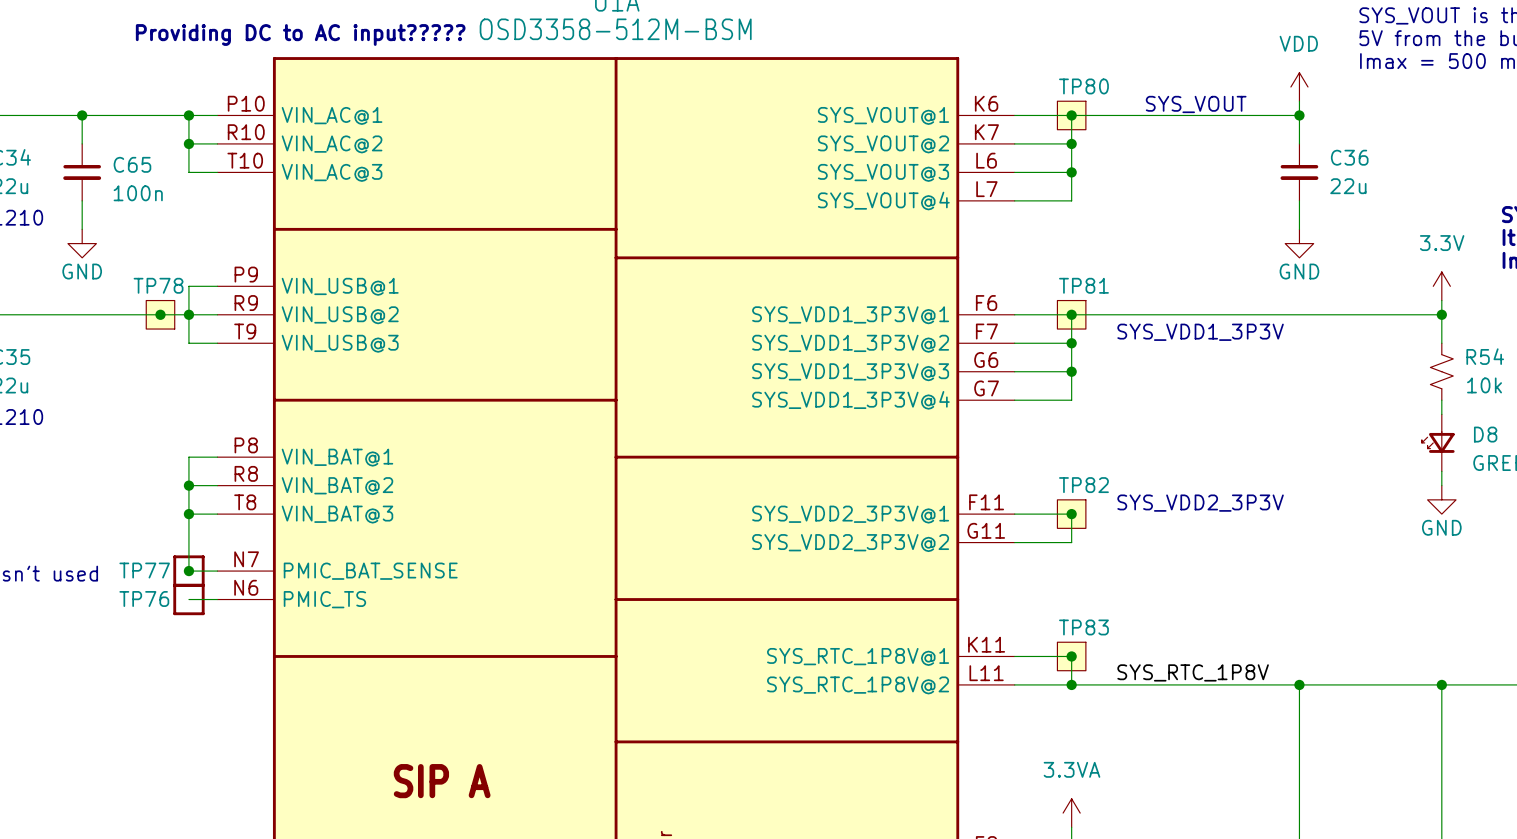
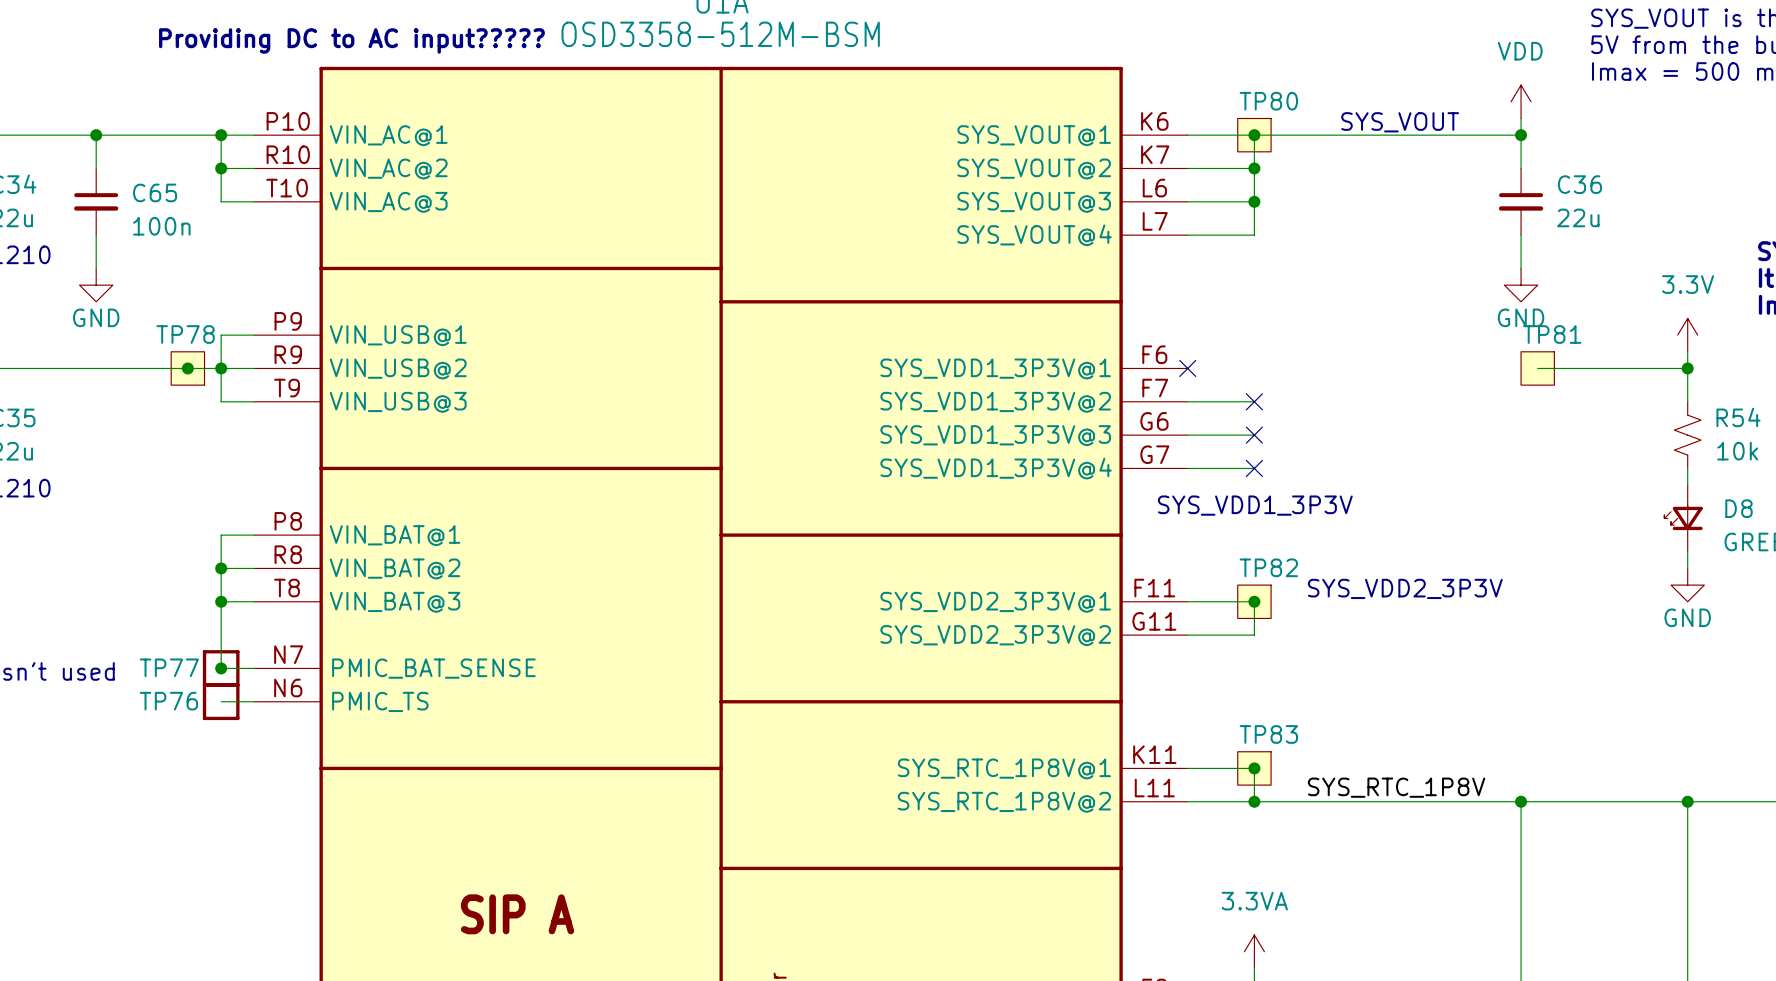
wire: (1014, 314) (1313, 314) -> none
no-connect mark: none -> (1187, 368)
wire: (1071, 314) (1071, 400) -> none
junction: (1071, 314) -> none
TP81 position: (1071, 314) -> (1537, 368)
text position: SYS_VDD1_3P3V (1200, 332) -> SYS_VDD1_3P3V (1255, 505)
junction: (1071, 343) -> none
no-connect mark: none -> (1254, 401)
junction: (1071, 371) -> none
no-connect mark: none -> (1254, 435)
no-connect mark: none -> (1254, 468)

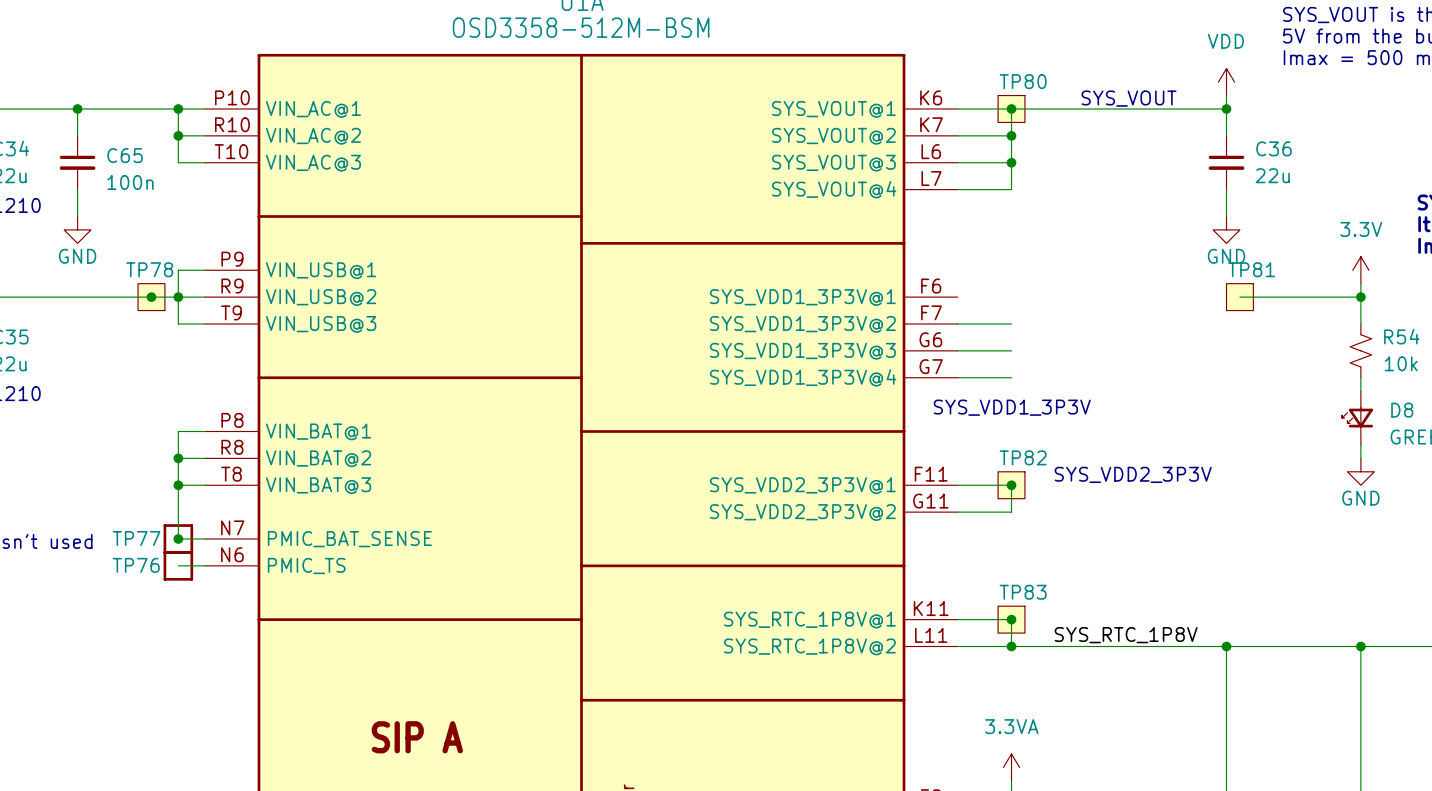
text: Providing DC to AC input????? (351, 40) -> none
no-connect mark: (1187, 368) -> none
no-connect mark: (1254, 401) -> none
no-connect mark: (1254, 435) -> none
no-connect mark: (1254, 468) -> none

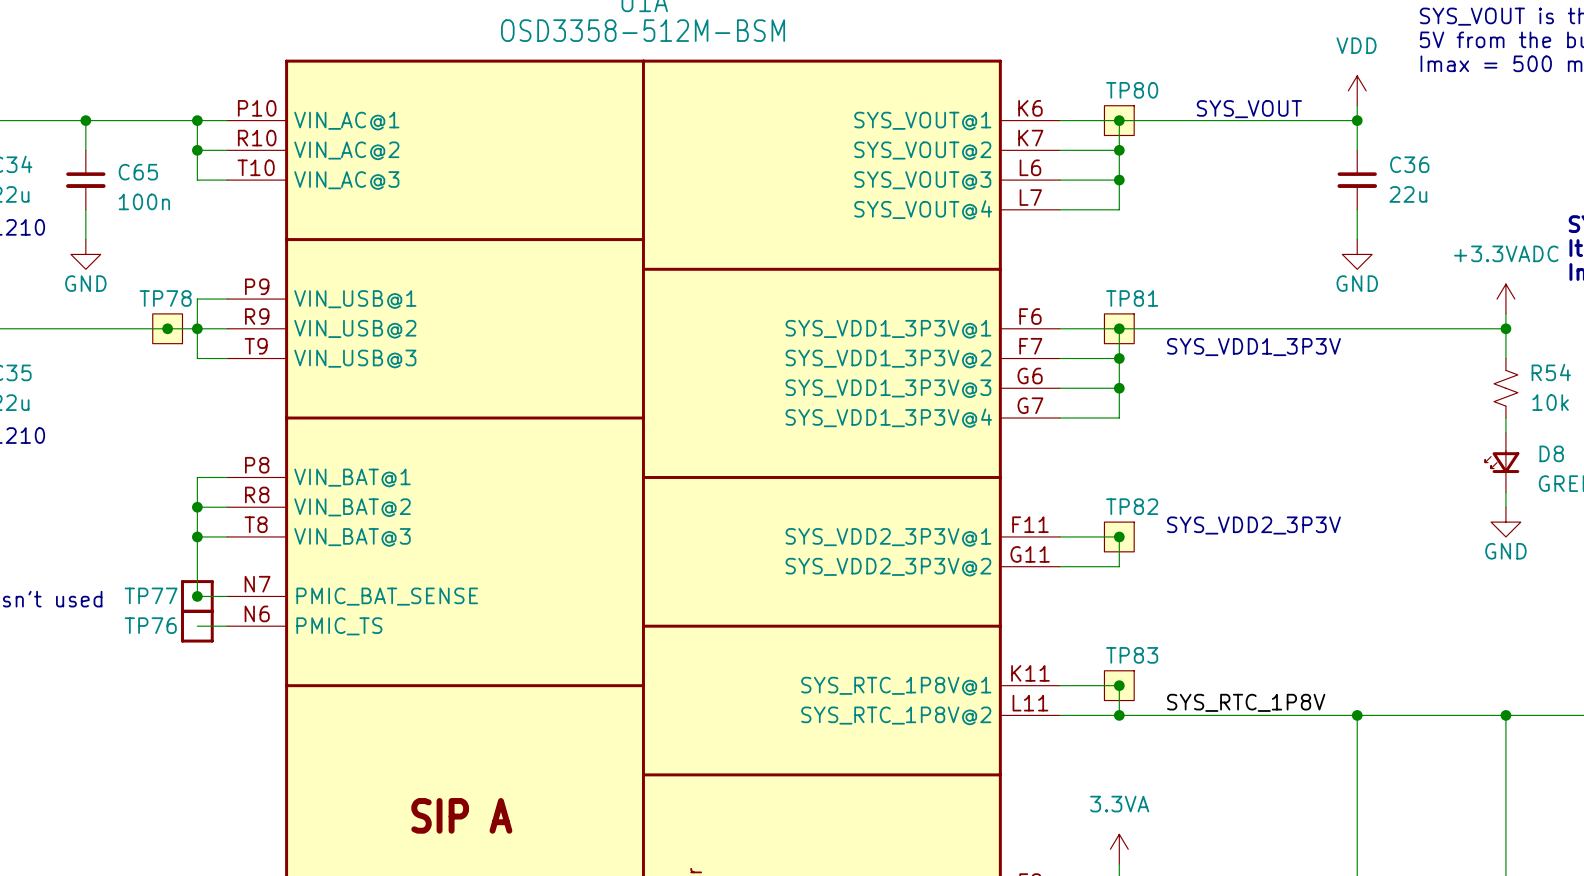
power symbol: 3.3V (1360, 270) -> +3.3VADC (1505, 299)
wire: none -> (1059, 328) (1372, 328)
wire: none -> (1119, 328) (1119, 418)
junction: none -> (1119, 328)
TP81 position: (1239, 297) -> (1119, 328)
junction: none -> (1119, 358)
junction: none -> (1119, 388)
text position: SYS_VDD1_3P3V (1012, 407) -> SYS_VDD1_3P3V (1253, 347)

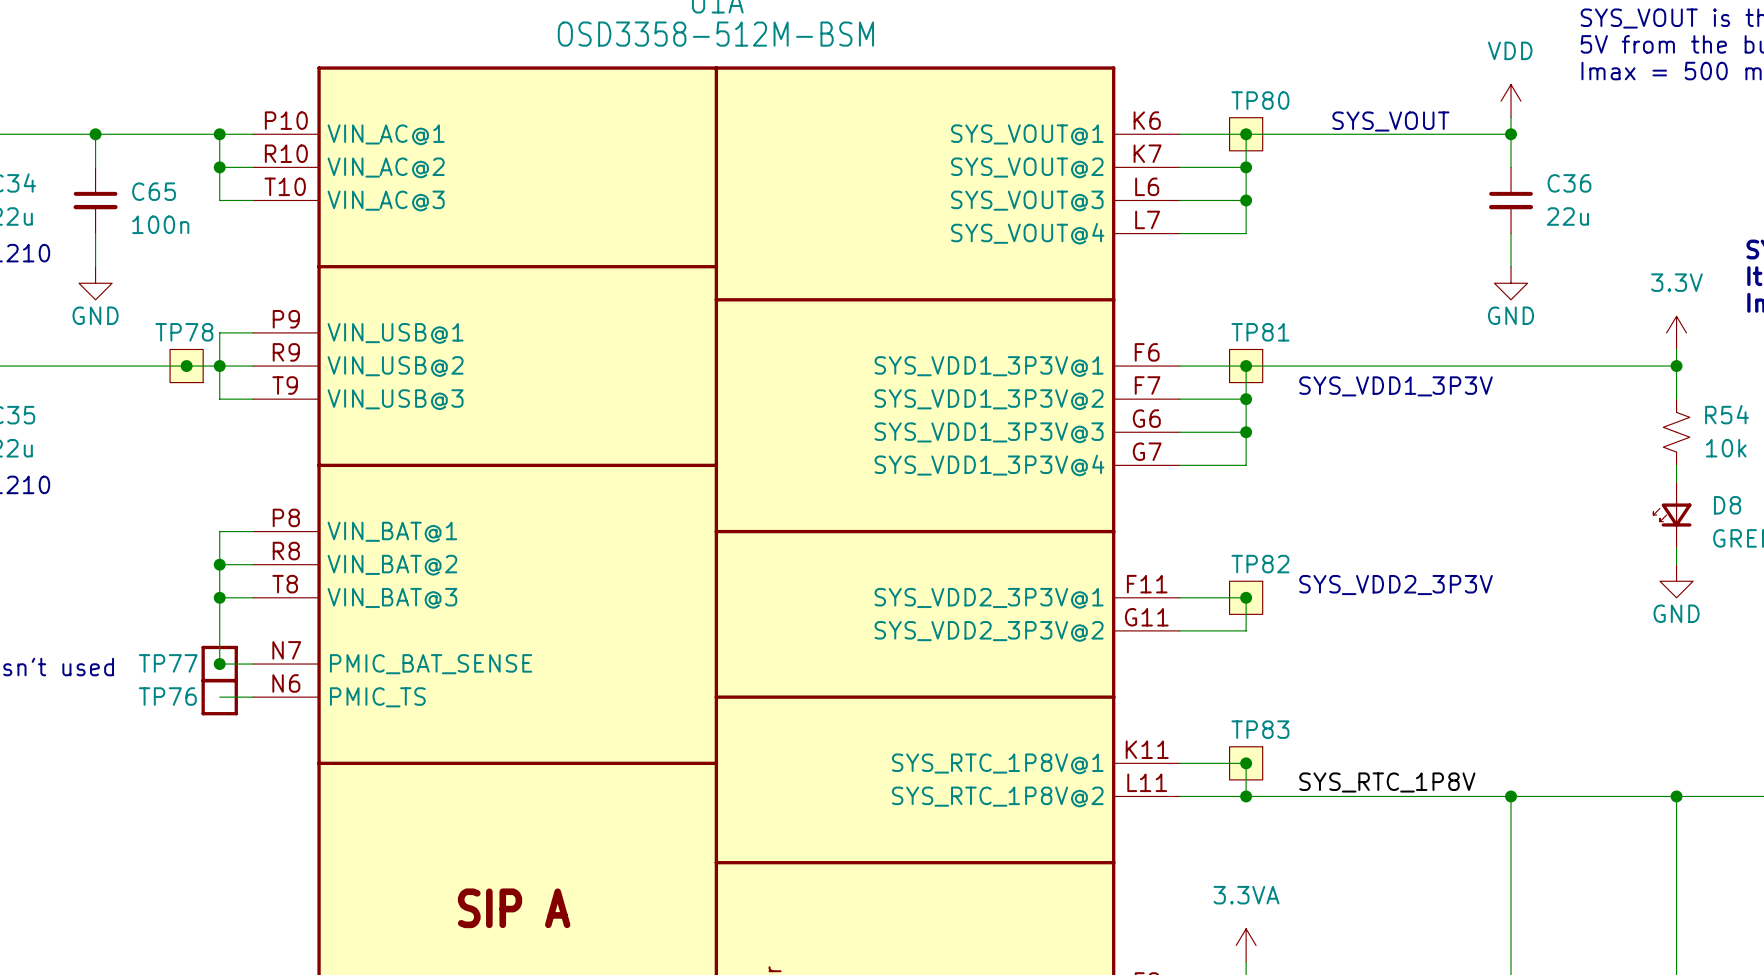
power symbol: +3.3VADC (1505, 299) -> 3.3V (1676, 332)

